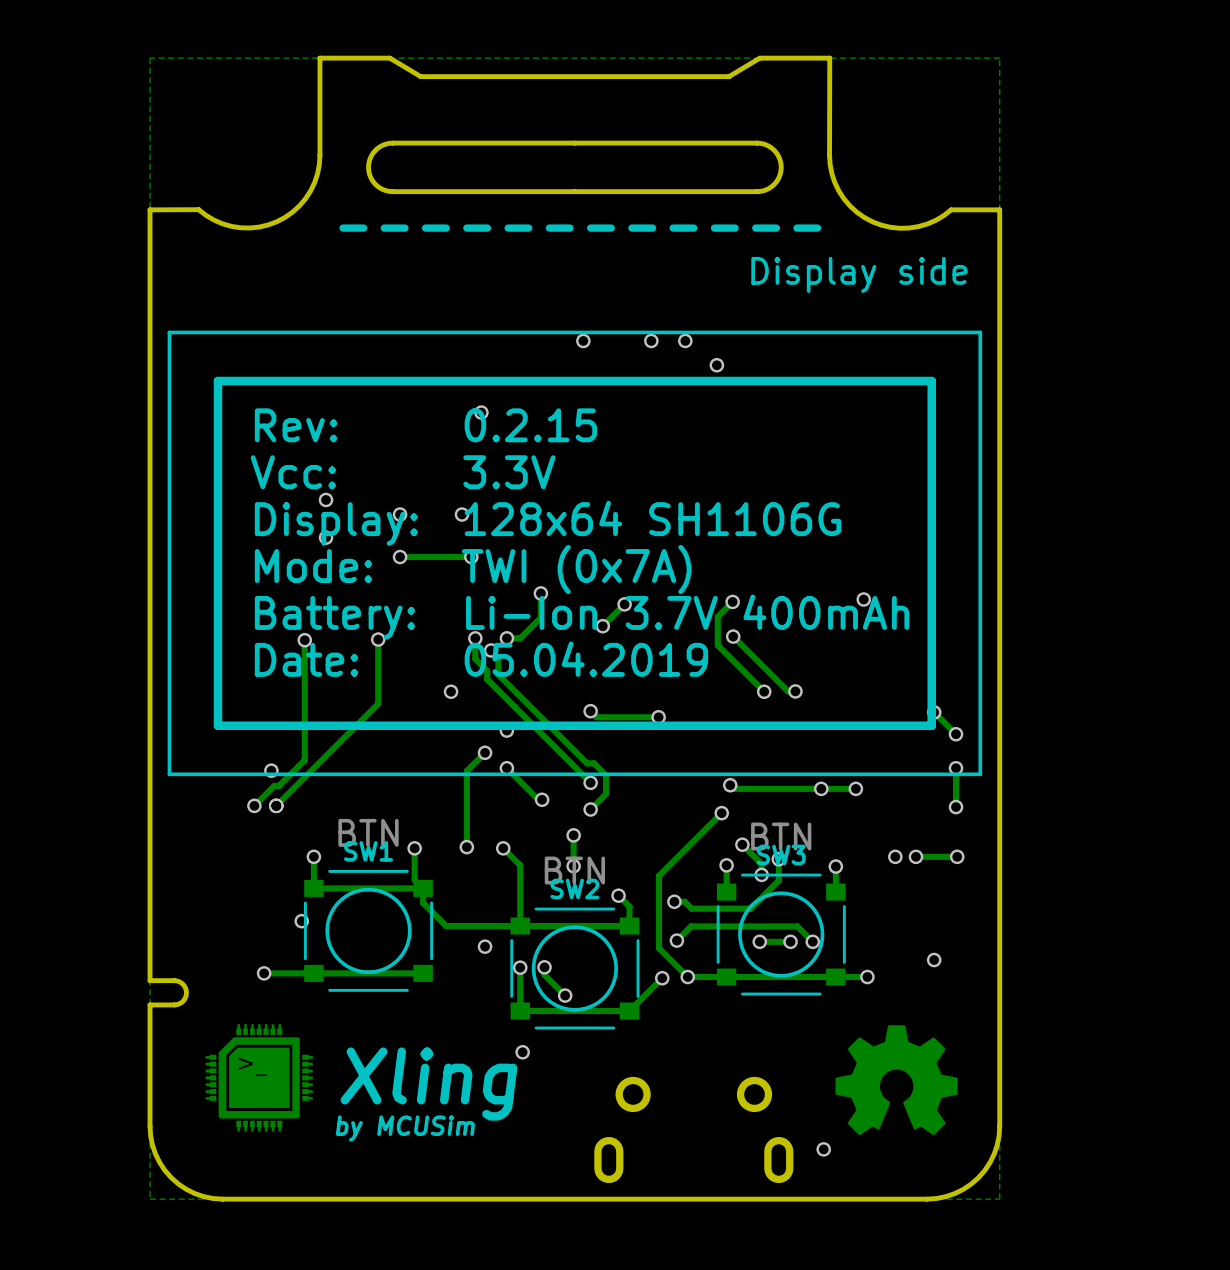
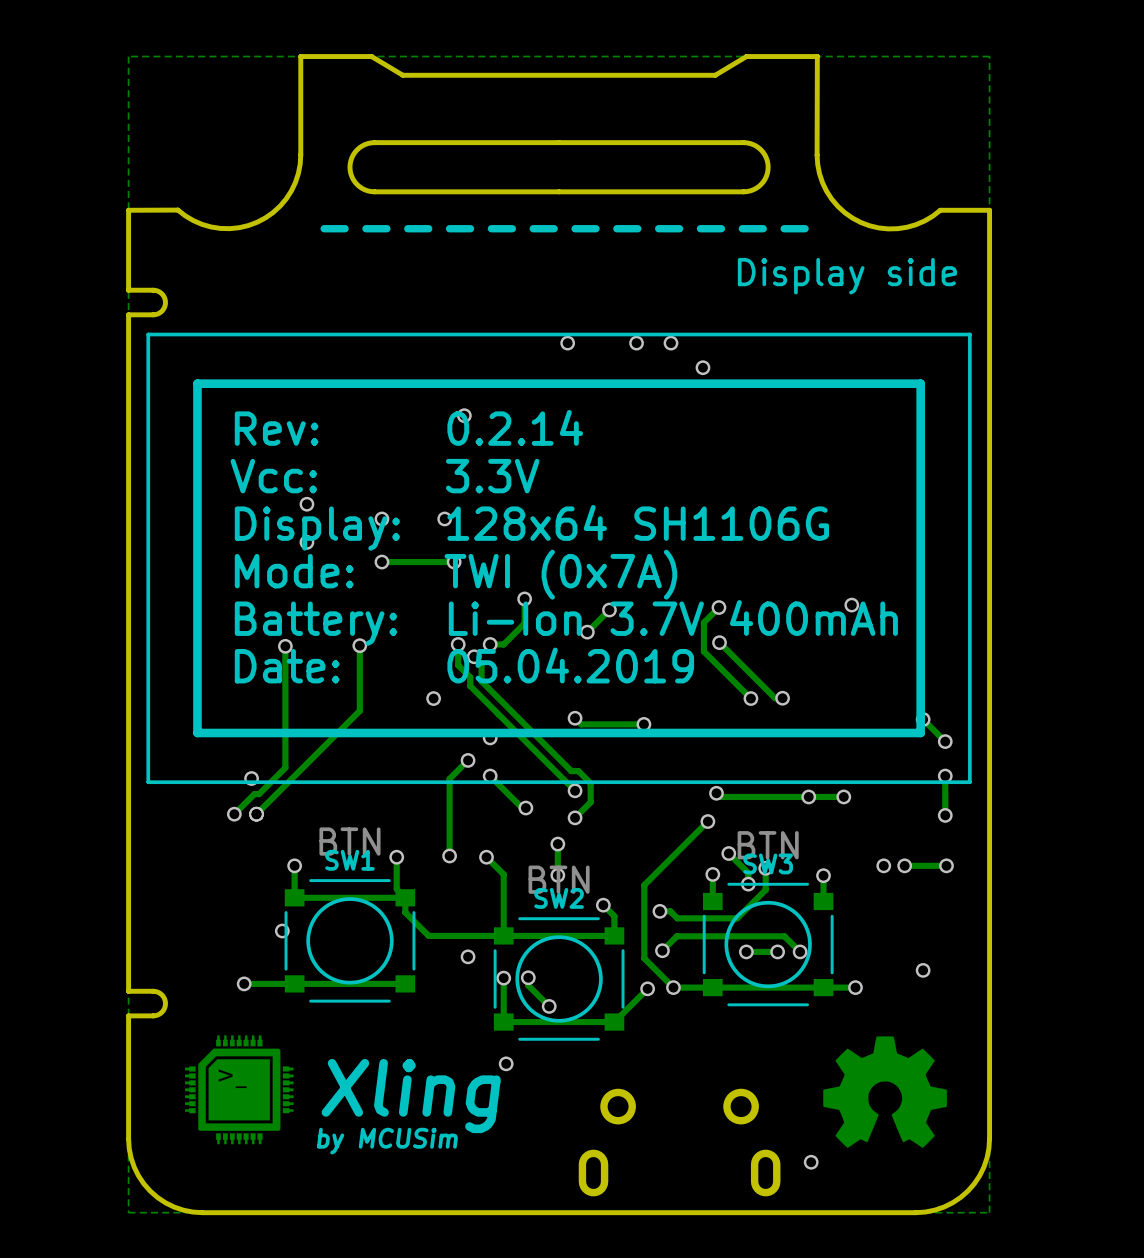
board edge: (150, 288) (150, 313) -> (128, 290) (156, 290) (162, 295) (165, 302) (162, 310) (156, 314) (128, 314)
text: 0.2.15 (530, 425) -> 0.2.14 (515, 427)

